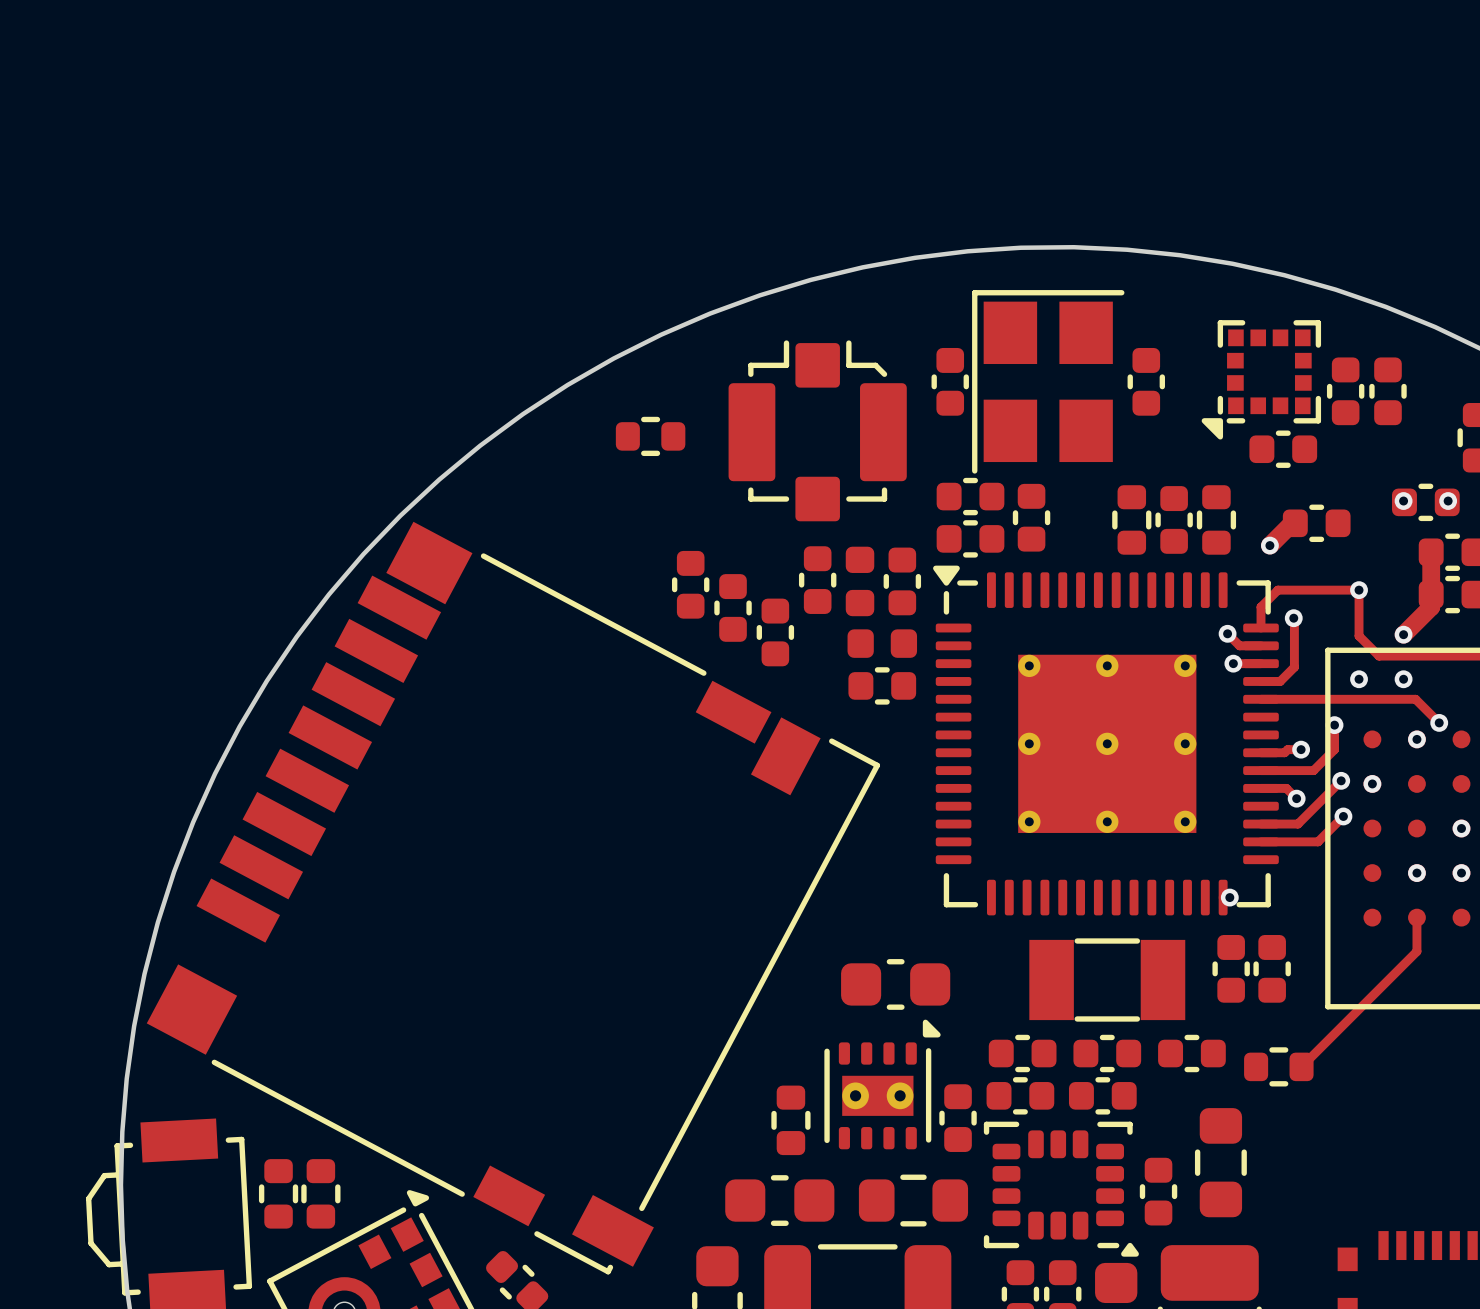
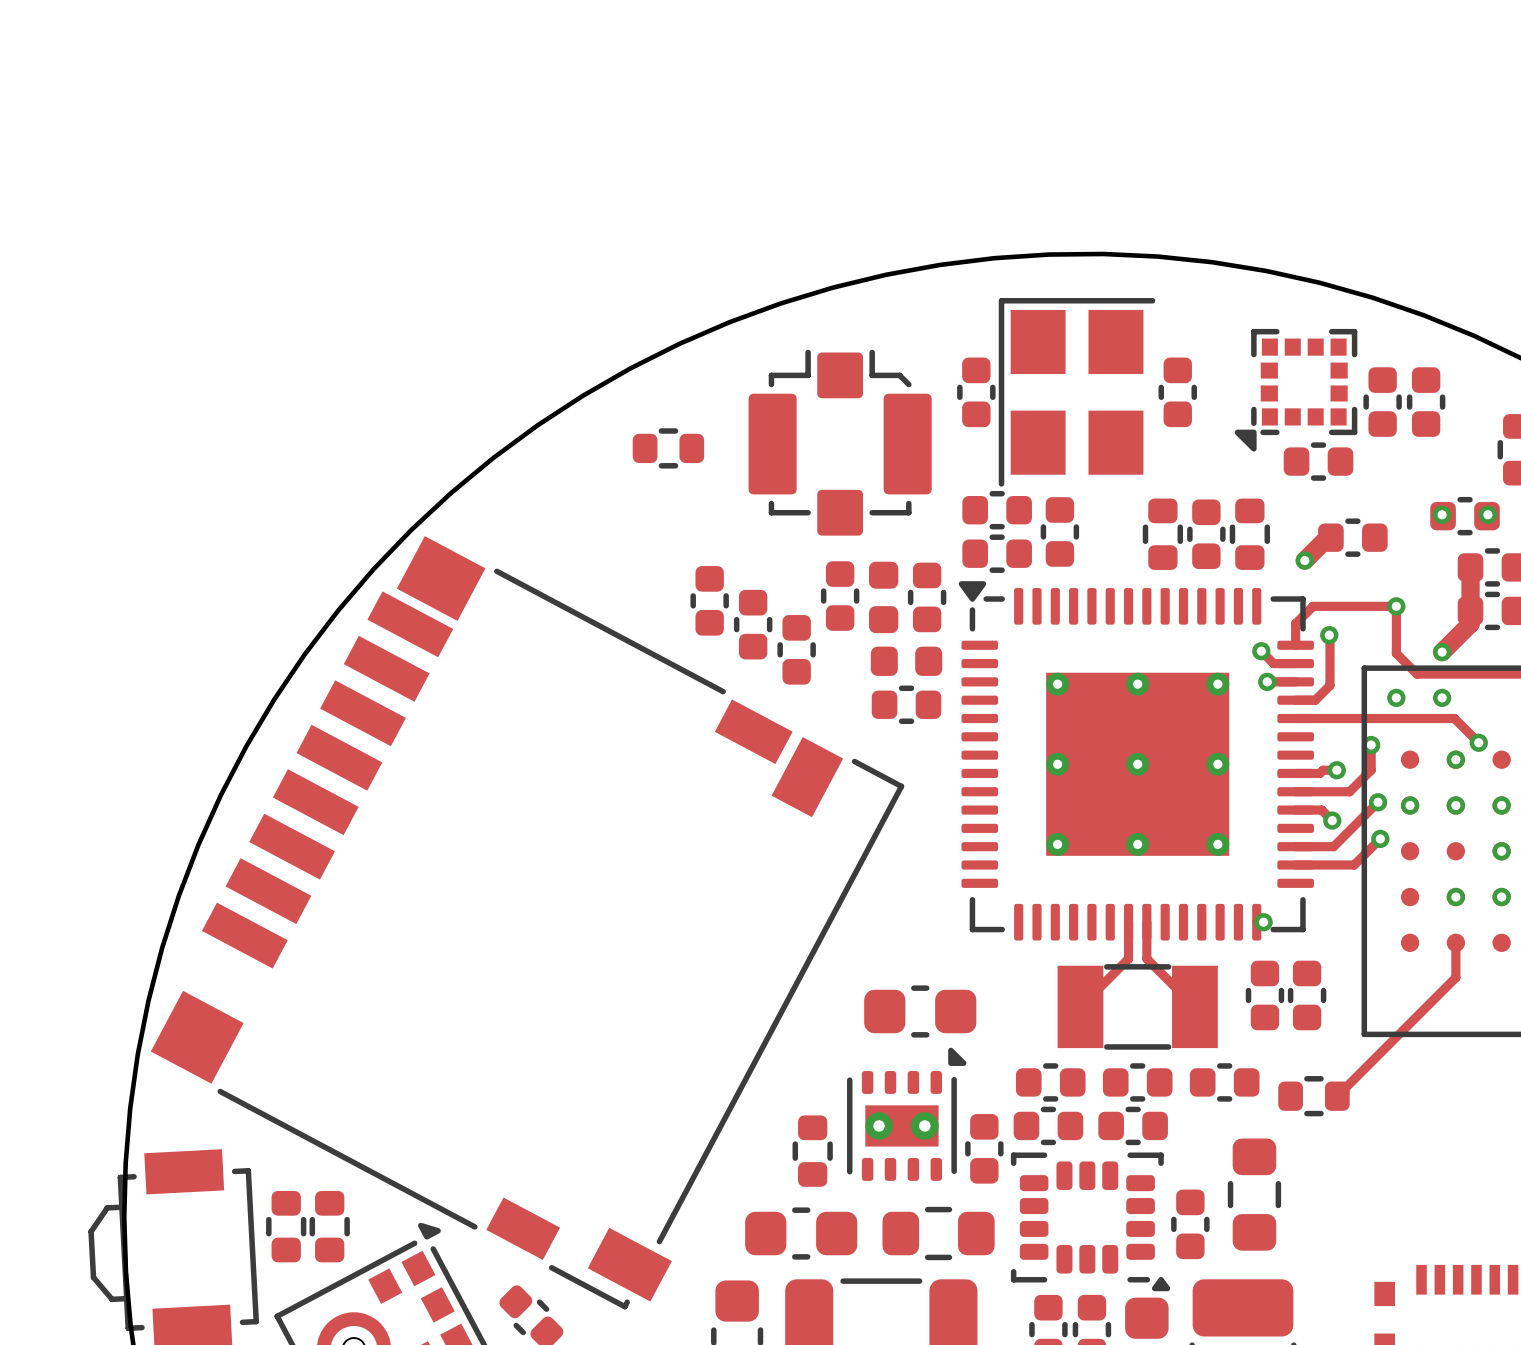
via: none -> (1455, 805)
via: none -> (1501, 805)
track: none -> (1128, 922) (1128, 958) (1080, 1006)
track: none -> (1146, 922) (1146, 958) (1194, 1006)

